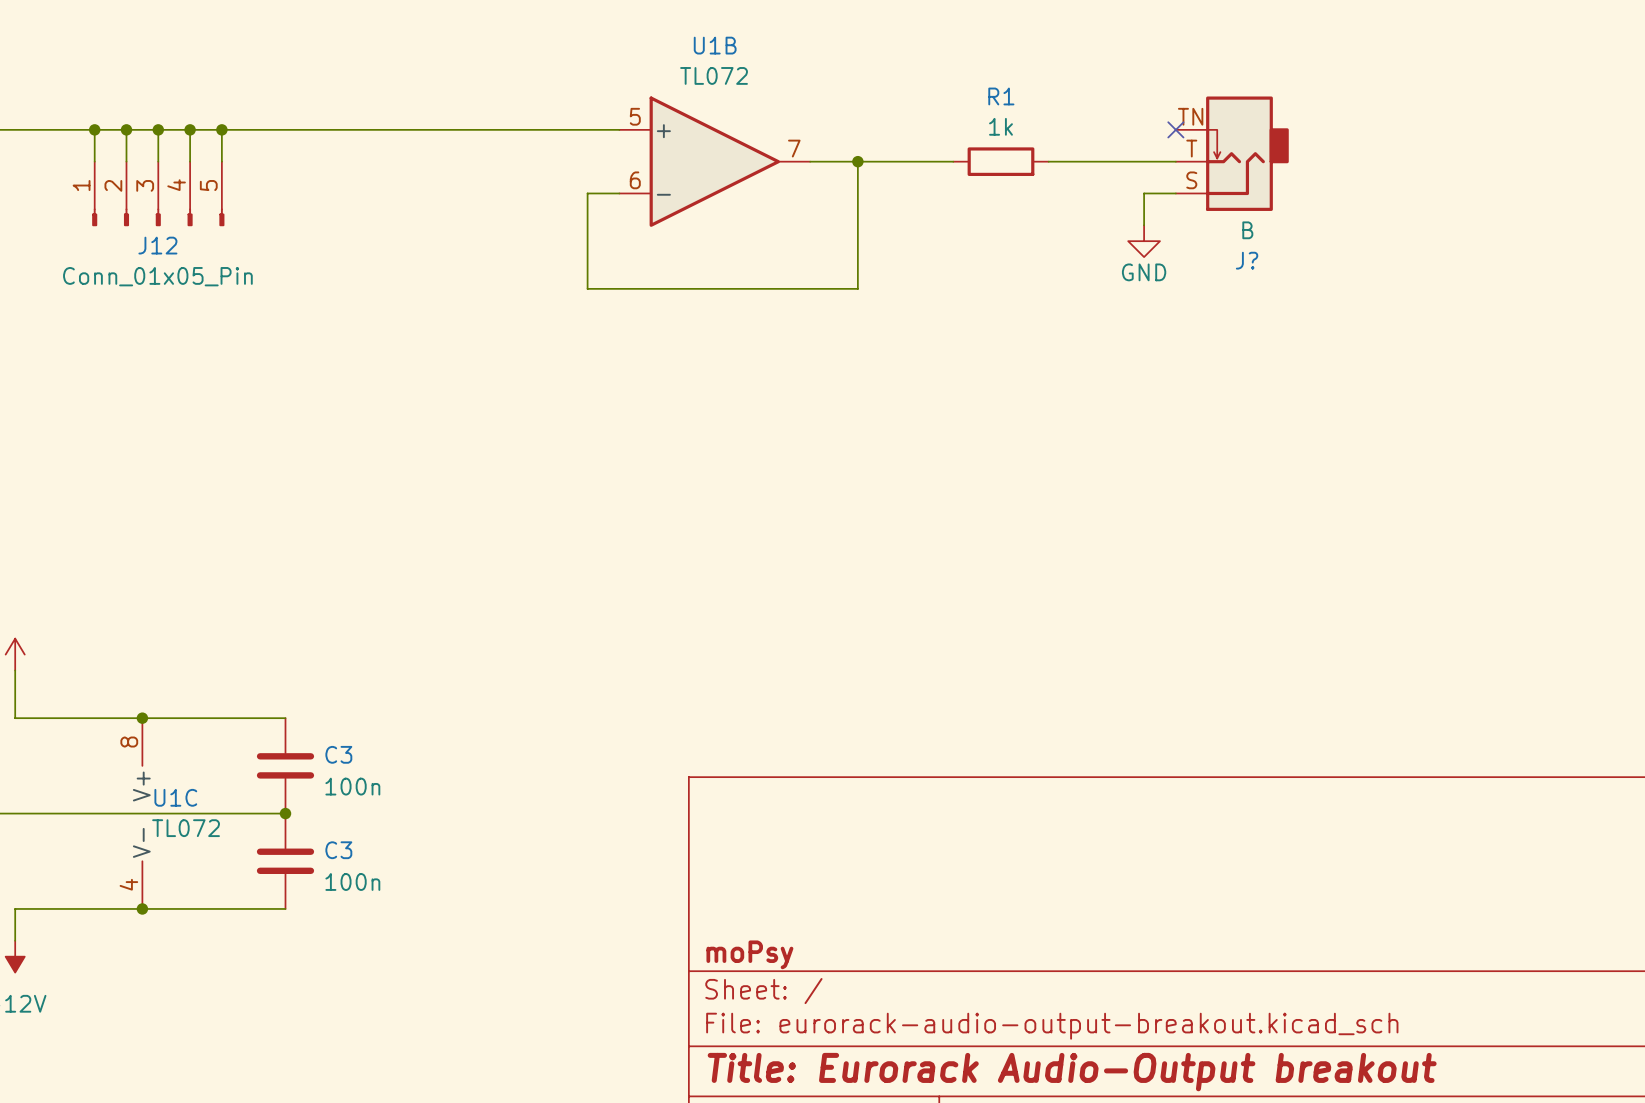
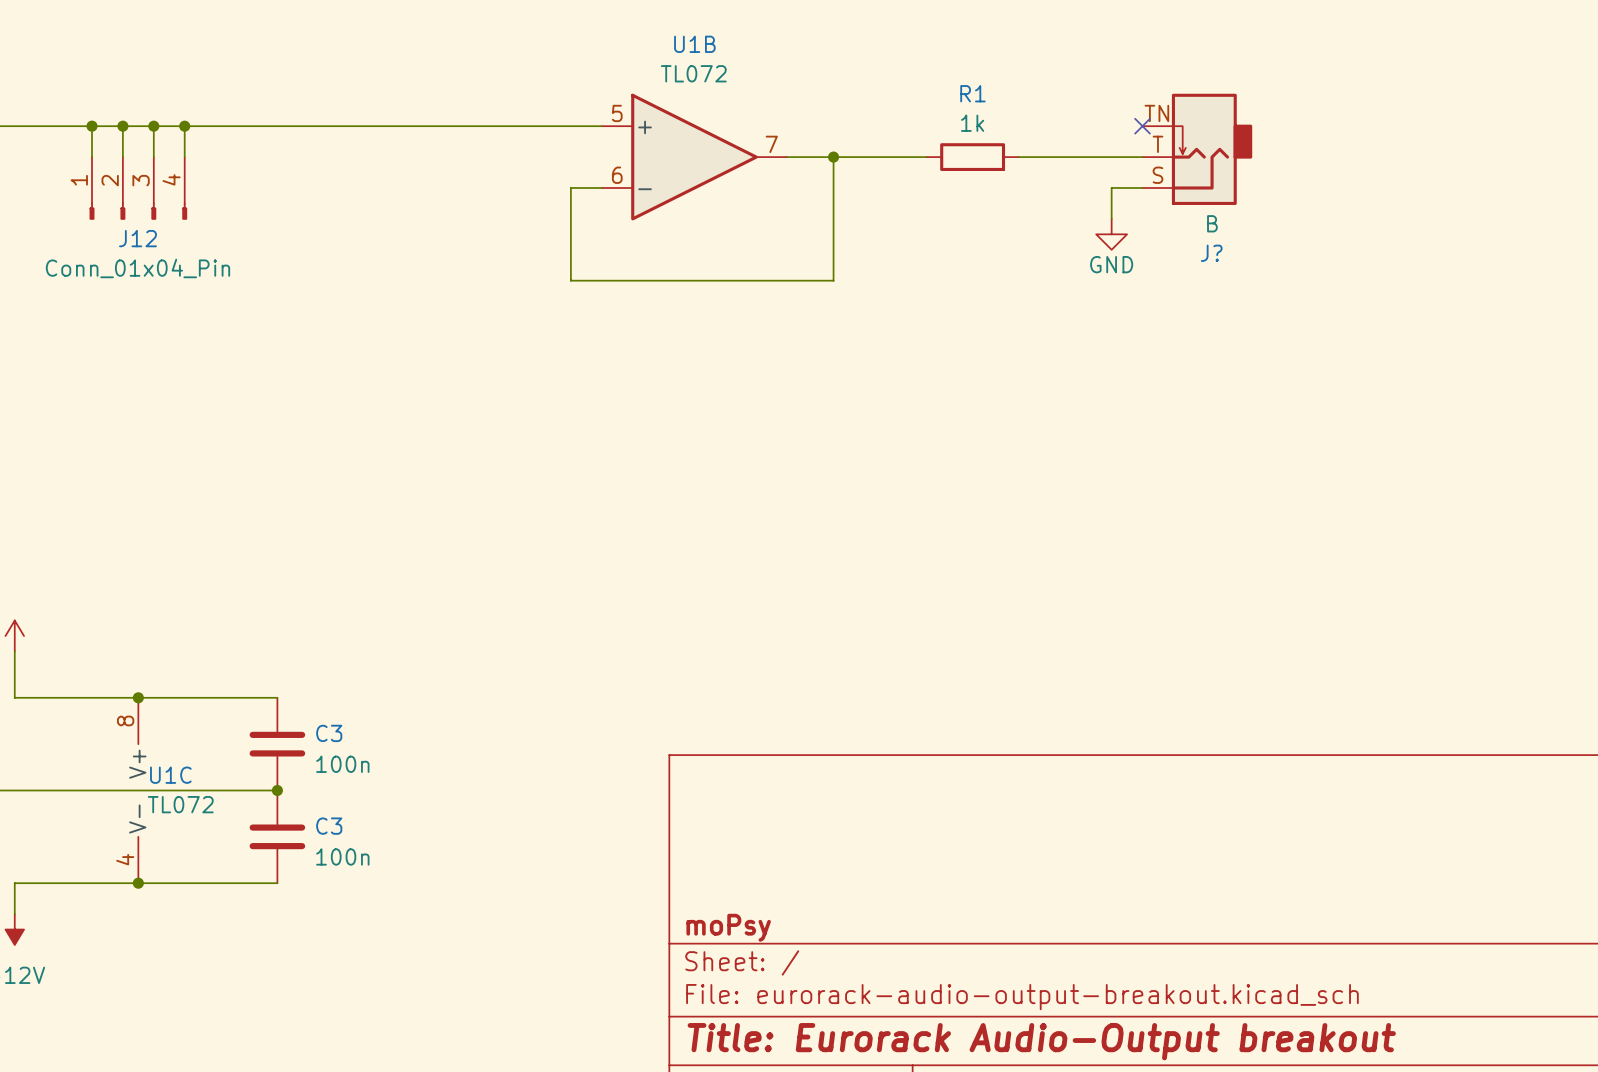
wire: (221, 129) (221, 161) -> none
junction: (221, 129) -> none
J12 symbol: [92, 161, 225, 227] -> [89, 157, 188, 220]
J12 value: Conn_01x05_Pin (157, 276) -> Conn_01x04_Pin (137, 268)

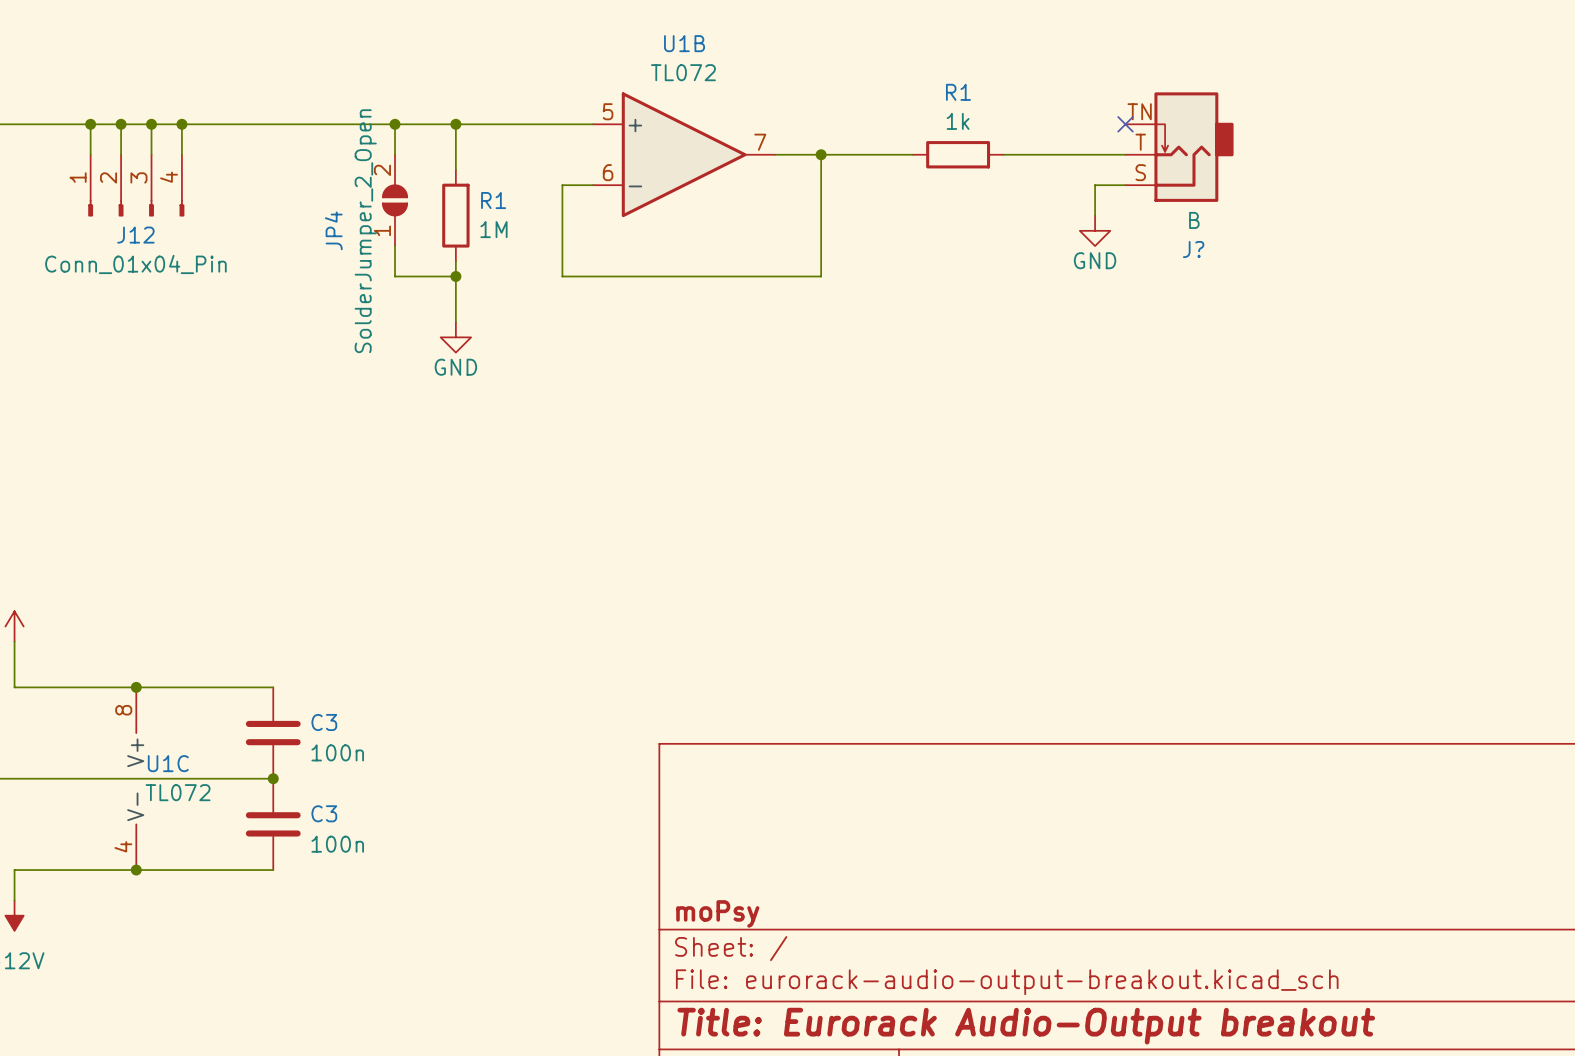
wire: none -> (395, 124) (395, 154)
junction: none -> (395, 124)
wire: none -> (455, 124) (455, 169)
junction: none -> (455, 124)
JP4: none -> SolderJumper_2_Open (395, 200)
R1: none -> 1M (455, 215)
wire: none -> (395, 246) (395, 276) (455, 276)
wire: none -> (455, 261) (455, 322)
junction: none -> (455, 276)
power symbol: none -> GND (455, 337)

